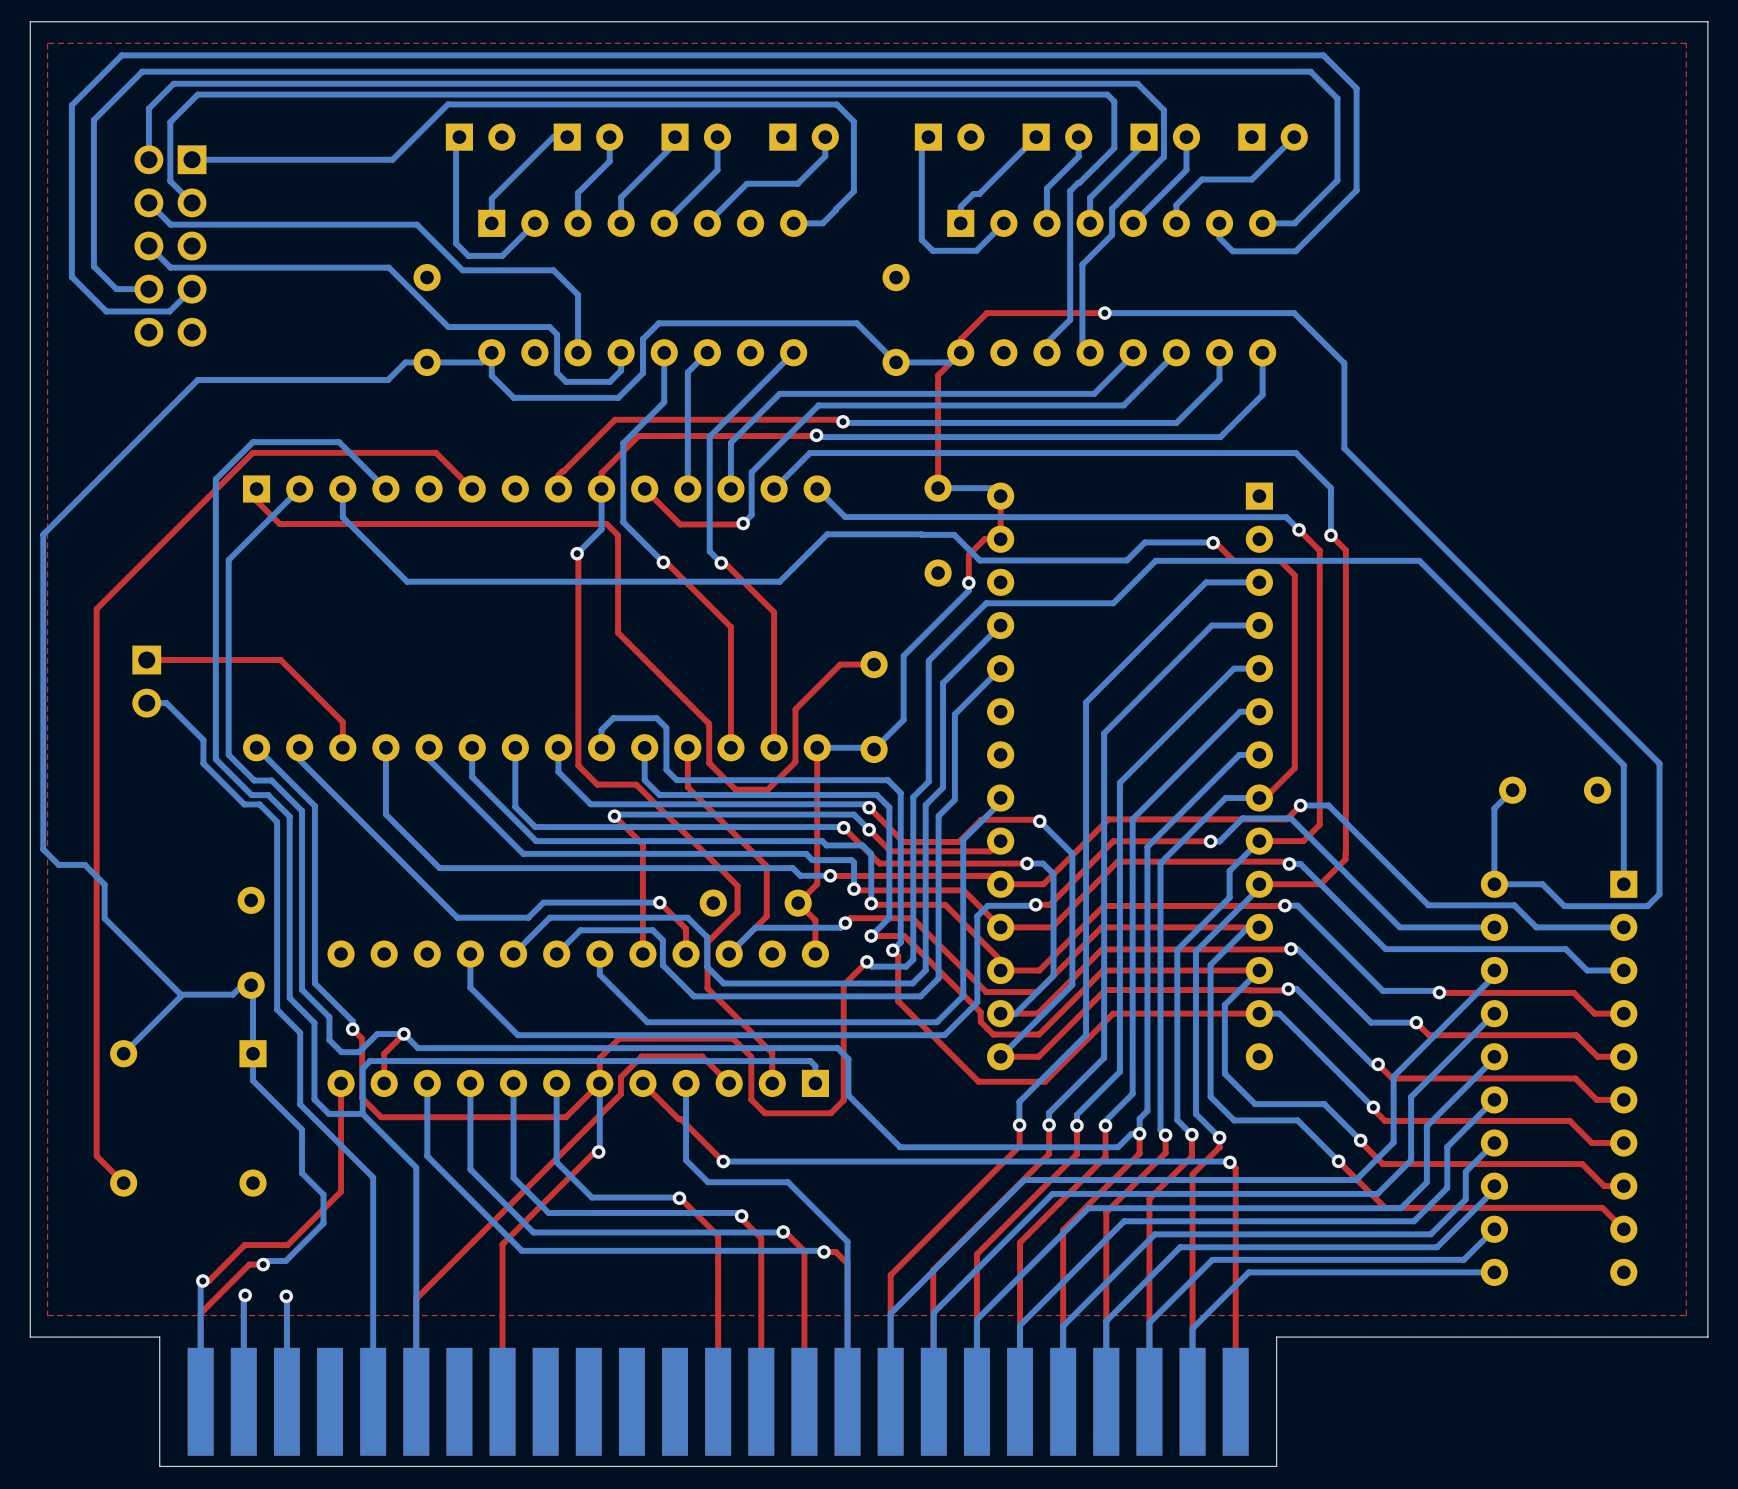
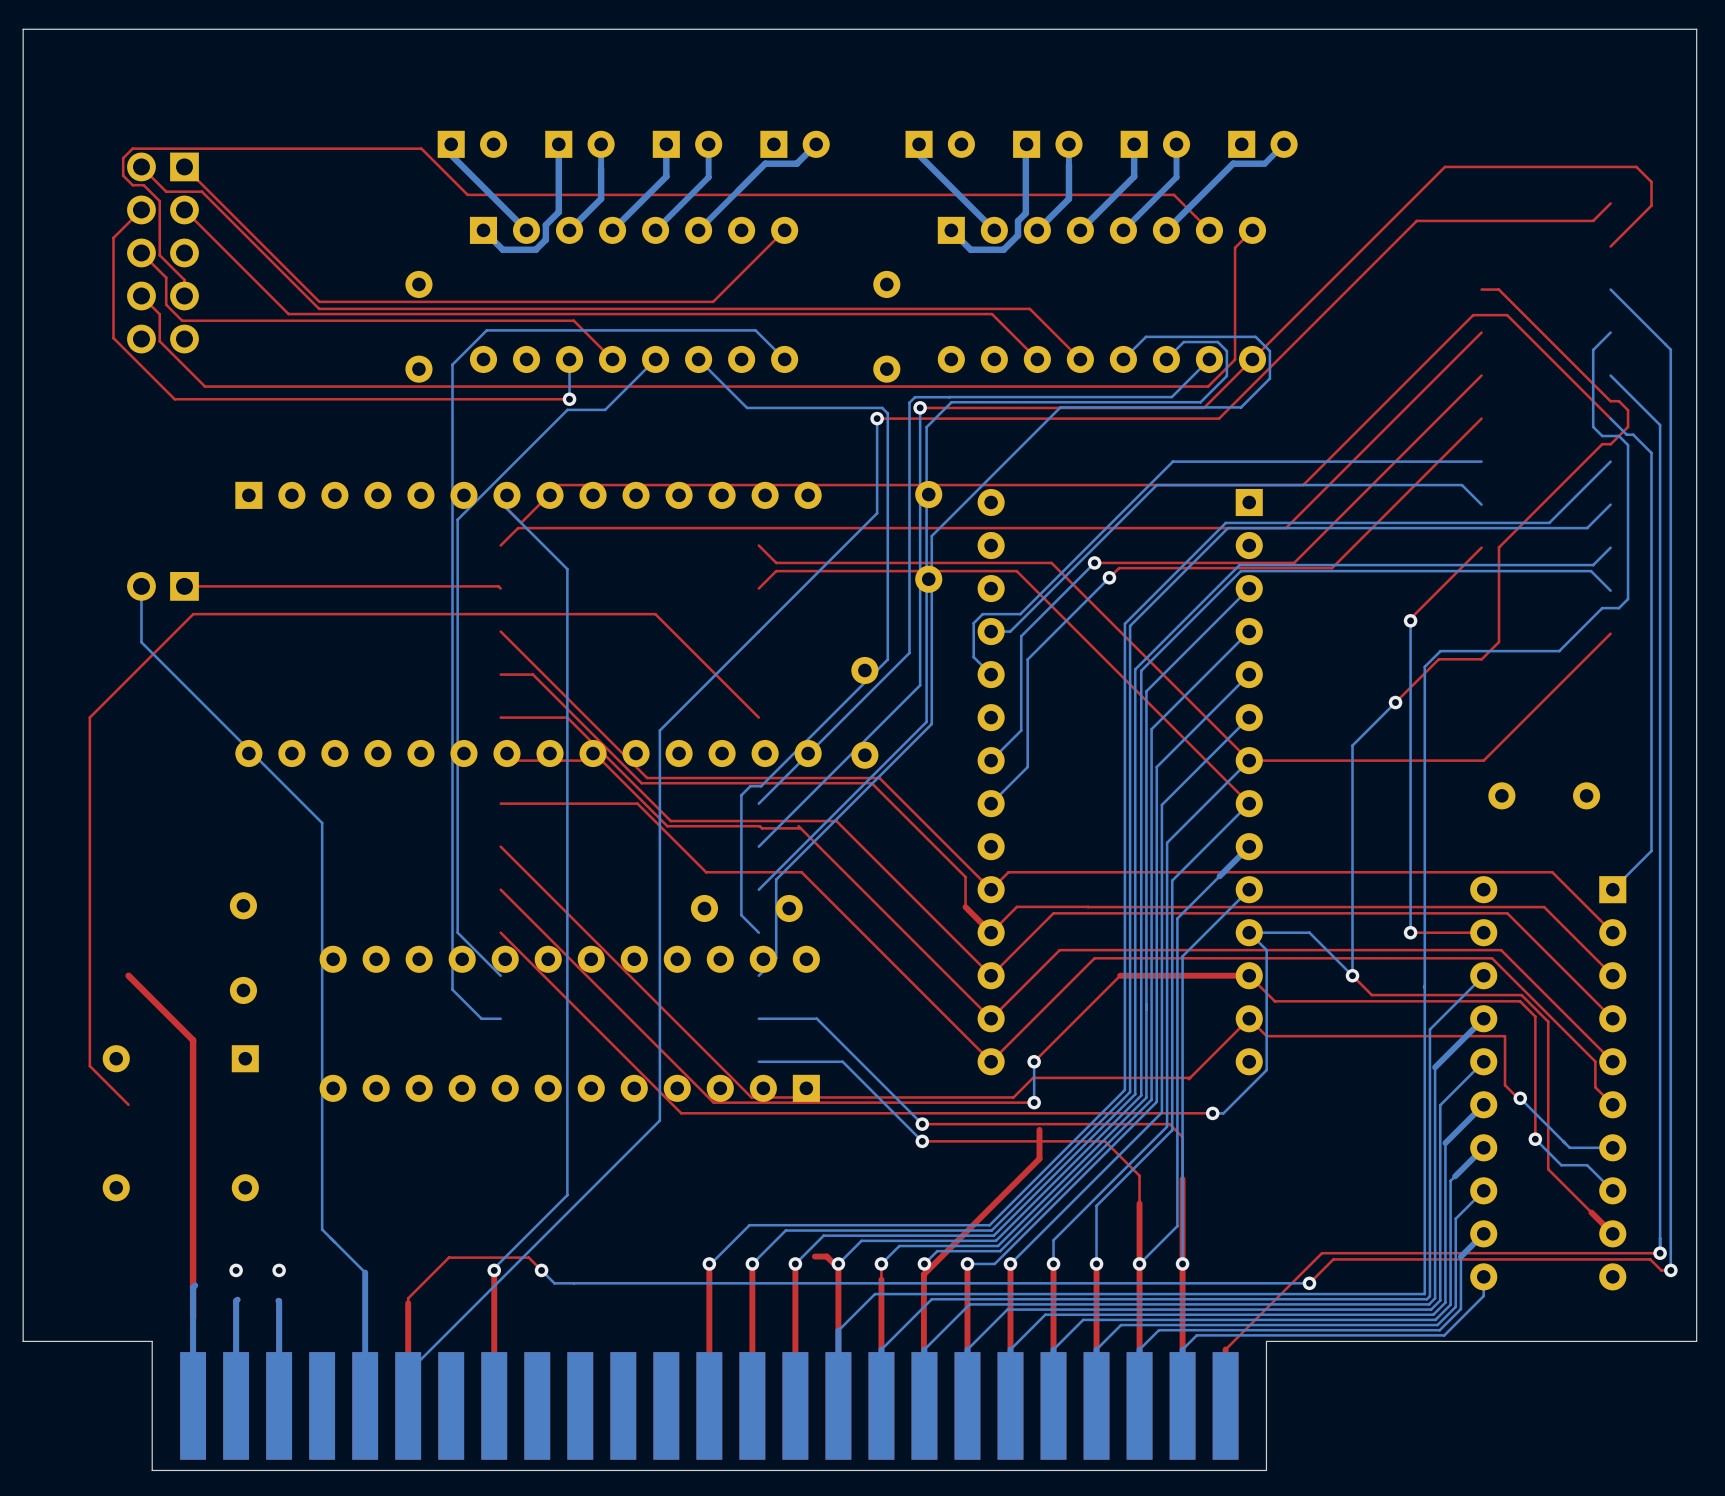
top zone outline: (1686, 43) (1686, 1315) (47, 1315) (47, 43) (1686, 43) -> none
bottom track: (567, 137) (553, 137) (491, 198) (491, 223) -> (551, 151) (558, 144) (558, 212) (545, 225) (545, 239) (535, 249) (502, 249) (483, 230)
bottom track: (825, 137) (825, 156) (797, 183) (747, 183) -> (816, 144) (796, 163) (765, 163) (738, 190)
bottom track: (1035, 137) (979, 193) (973, 193) (960, 206) (960, 223) -> (1025, 145) (1025, 213) (1018, 221) (1018, 235) (1003, 249) (970, 249) (951, 230)
bottom track: (456, 140) (456, 243) (468, 255) (502, 255) (534, 223) -> (451, 144) (451, 155) (526, 230)
bottom track: (675, 143) (621, 197) (621, 223) -> (666, 144) (666, 176) (612, 230)
bottom track: (921, 143) (921, 239) (932, 250) (976, 250) (1003, 223) -> (919, 144) (919, 155) (994, 230)
bottom track: (1144, 144) (1090, 197) (1090, 223) -> (1134, 144) (1134, 176) (1080, 230)
bottom track: (1078, 156) (1047, 188) (1047, 223) -> (1068, 163) (1068, 198) (1037, 230)
bottom track: (1274, 156) (1251, 179) (1201, 179) (1176, 205) (1176, 223) -> (1264, 163) (1233, 163) (1166, 230)
top track: none -> (141, 166) (166, 191) (201, 191) (319, 308) (1029, 308) (1080, 359)
bottom track: (148, 159) (148, 108) (173, 83) (1137, 83) (1163, 110) (1163, 157) (1112, 208) (1112, 234) (1082, 264) (1082, 345) (1090, 352) -> none
top track: none -> (184, 166) (319, 301) (713, 301) (784, 230)
bottom track: (192, 159) (392, 159) (447, 104) (836, 104) (853, 121) (853, 191) (822, 223) (793, 223) -> none
bottom track: (609, 161) (578, 193) (578, 223) -> (601, 168) (601, 198) (569, 230)
top track: none -> (1610, 203) (1593, 220) (1416, 220) (1219, 418) (877, 418)
top track: none -> (141, 209) (113, 237) (113, 338) (174, 399) (569, 399)
bottom track: (148, 202) (170, 224) (417, 224) (462, 270) (553, 270) (578, 294) (578, 352) -> (569, 399) (569, 359)
top track: none -> (184, 209) (288, 314) (991, 314) (1037, 359)
bottom track: (192, 202) (170, 181) (170, 122) (197, 94) (1107, 94) (1114, 101) (1114, 148) (1070, 191) (1070, 319) (1047, 342) -> none
top track: none -> (1209, 230) (1173, 194) (467, 194) (421, 148) (132, 148) (123, 158) (123, 175) (132, 185) (143, 185) (159, 201) (159, 255) (184, 280) (184, 296)
bottom track: (1219, 223) (1219, 237) (1232, 251) (1295, 251) (1356, 190) (1356, 88) (1323, 55) (121, 55) (71, 105) (71, 276) (106, 311) (169, 311) (192, 289) -> none
top track: none -> (1252, 230) (1235, 247) (1235, 359) (1208, 386) (204, 386) (159, 341) (159, 314) (141, 296)
bottom track: (1262, 223) (1294, 223) (1337, 180) (1337, 98) (1310, 71) (142, 71) (93, 120) (93, 266) (116, 289) (148, 289) -> none
top track: none -> (1610, 246) (1651, 205) (1651, 181) (1636, 166) (1445, 166) (1203, 407) (920, 407)
top track: none -> (141, 252) (166, 277) (166, 304) (182, 320) (573, 320) (612, 359)
bottom track: (148, 246) (170, 267) (388, 267) (448, 327) (549, 327) (557, 334) (557, 372) (566, 381) (609, 381) (621, 370) (621, 352) -> none
top track: none -> (1481, 289) (1498, 289) (1610, 401) (1618, 401) (1628, 410) (1628, 426) (1610, 444) (1602, 444) (1498, 547) (1498, 642) (1481, 659) (1438, 659) (1395, 702)
bottom track: none -> (1610, 289) (1670, 349) (1670, 1270)
top track: (1104, 313) (986, 313) (960, 339) (960, 352) (938, 375) (938, 488) -> none
bottom track: (1104, 313) (1294, 313) (1344, 363) (1344, 448) (1659, 763) (1659, 894) (1647, 906) (1564, 906) (1542, 884) (1494, 884) (1494, 808) (1512, 790) -> none
via: (1104, 313) -> none
top track: none -> (1481, 332) (1286, 528) (518, 528) (500, 545)
bottom track: (664, 352) (664, 402) (623, 443) (623, 522) (663, 562) -> (655, 359) (605, 409) (567, 409) (457, 519) (457, 932) (500, 975)
bottom track: (707, 352) (687, 372) (687, 489) -> (698, 359) (747, 407) (882, 407) (887, 413) (887, 659) (761, 786) (750, 786) (741, 795) (741, 915) (758, 932)
bottom track: (793, 352) (709, 436) (709, 551) (721, 563) -> (784, 359) (755, 330) (486, 330) (452, 364) (452, 989) (481, 1018) (500, 1018)
bottom track: (960, 352) (951, 362) (896, 362) (856, 323) (658, 323) (643, 339) (643, 373) (618, 397) (513, 397) (491, 375) (491, 352) (482, 362) (405, 362) (387, 380) (197, 380) (43, 534) (43, 849) (58, 864) (84, 864) (104, 884) (104, 918) (180, 994) -> none
bottom track: none -> (1123, 359) (1146, 336) (1255, 336) (1269, 351) (1269, 378) (1241, 407) (1060, 407) (931, 536) (931, 724) (776, 879) (776, 958) (758, 975)
bottom track: (1176, 352) (1123, 405) (818, 405) (751, 472) (751, 514) (743, 523) -> (1166, 359) (1183, 342) (1217, 342) (1226, 351) (1226, 375) (1200, 402) (951, 402) (926, 427) (926, 721) (758, 889)
bottom track: (1219, 352) (1219, 379) (1176, 422) (843, 421) -> (1209, 359) (1171, 397) (915, 397) (909, 402) (909, 652) (758, 803)
bottom track: (1262, 352) (1262, 394) (1220, 437) (818, 437) (816, 435) -> none
bottom track: (1133, 354) (1094, 393) (779, 393) (730, 442) (730, 489) -> none
top track: none -> (1481, 375) (1294, 562) (1094, 562)
bottom track: none -> (1610, 375) (1660, 425) (1660, 1253)
via: none -> (569, 399)
bottom track: none -> (920, 407) (920, 685) (758, 846)
via: none -> (920, 407)
via: none -> (877, 418)
top track: none -> (1481, 418) (1332, 568) (1119, 568) (1109, 577)
top track: none -> (1610, 418) (1507, 315) (1473, 315) (1303, 485) (558, 485) (521, 522) (500, 502)
top track: (843, 421) (840, 419) (615, 419) (558, 475) (558, 489) -> none
via: (843, 421) -> none
top track: (816, 435) (638, 436) (601, 473) (601, 489) -> none
via: (816, 435) -> none
bottom track: none -> (1610, 461) (1549, 522) (1225, 522) (1124, 623) (1124, 1089) (989, 1225) (749, 1225) (709, 1265) (709, 1268)
bottom track: (938, 488) (992, 488) (1000, 496) -> none
top track: (256, 489) (256, 500) (279, 523) (606, 523) (618, 535) (618, 632) (709, 723) (709, 763) (735, 789) (767, 789) (795, 762) (795, 709) (840, 664) (874, 664) -> none
bottom track: (299, 489) (228, 560) (228, 754) (254, 780) (271, 780) (302, 810) (302, 989) (329, 1017) (329, 1040) (341, 1052) (359, 1052) (377, 1034) (403, 1034) (418, 1048) (837, 1048) (848, 1058) (848, 1095) (900, 1147) (1118, 1147) (1131, 1133) (1139, 1133) (1139, 1118) (1147, 1110) (1147, 846) (1239, 754) (1259, 754) -> (1053, 1263) (1053, 1240) (1167, 1126) (1167, 842) (1249, 760)
bottom track: (342, 489) (342, 517) (407, 581) (779, 581) (827, 534) (954, 534) (979, 560) (1126, 560) (1144, 542) (1213, 542) -> none
bottom track: (385, 489) (339, 442) (253, 442) (215, 479) (215, 759) (251, 795) (268, 795) (289, 816) (289, 998) (314, 1022) (314, 1099) (329, 1113) (362, 1113) -> none
top track: (472, 489) (436, 452) (252, 452) (96, 609) (96, 1156) (123, 1183) -> none
bottom track: (601, 489) (601, 529) (577, 553) -> none
top track: (644, 489) (680, 524) (743, 523) -> none
bottom track: (774, 489) (810, 453) (1295, 453) (1330, 488) (1330, 535) -> none
bottom track: (817, 489) (845, 517) (1003, 517) -> none
bottom track: none -> (500, 502) (567, 569) (567, 1195) (494, 1268)
top track: (1000, 496) (1000, 539) (984, 539) (968, 555) (968, 582) -> none
bottom track: none -> (1610, 504) (1587, 528) (1227, 528) (1130, 625) (1130, 1092) (991, 1230) (785, 1230) (752, 1263)
bottom track: (1003, 517) (1286, 517) (1299, 529) -> none
via: (743, 523) -> none
top track: (1299, 529) (1319, 550) (1319, 824) (1303, 841) (1259, 841) -> none
via: (1299, 529) -> none
top track: (1330, 535) (1345, 550) (1345, 859) (1320, 884) (1259, 884) -> none
via: (1330, 535) -> none
top track: none -> (758, 545) (776, 562) (1051, 562) (1249, 760) (1483, 760) (1610, 633)
top track: none -> (1481, 547) (1410, 620)
bottom track: none -> (1610, 547) (1593, 565) (1239, 565) (1135, 669) (1135, 1094) (993, 1235) (823, 1235) (795, 1263)
top track: (1213, 542) (1215, 542) (1233, 560) (1280, 560) (1294, 575) (1294, 768) (1264, 798) -> none
via: (1213, 542) -> none
top track: (577, 553) (578, 765) (597, 784) (636, 784) (737, 885) (737, 912) (707, 942) (707, 988) (772, 1053) (772, 1083) -> none
via: (577, 553) -> none
bottom track: none -> (1094, 562) (1021, 636) (1021, 730) (991, 760)
via: none -> (1094, 562)
top track: (663, 562) (666, 562) (730, 627) (730, 747) -> none
via: (663, 562) -> none
top track: (721, 563) (724, 563) (774, 612) (774, 747) -> none
via: (721, 563) -> none
bottom track: none -> (1109, 577) (1027, 659) (1027, 767) (991, 803)
via: none -> (1109, 577)
top track: none -> (184, 586) (498, 586) (500, 588)
top track: none -> (758, 588) (776, 571) (1016, 571) (1249, 803)
bottom track: (968, 582) (968, 590) (903, 655) (903, 719) (874, 749) -> none
via: (968, 582) -> none
bottom track: (1259, 582) (1206, 582) (1086, 702) (1086, 1035) (1019, 1101) (1019, 1125) -> (1249, 588) (1146, 691) (1146, 1097) (998, 1246) (899, 1246) (881, 1263)
bottom track: none -> (1610, 590) (1591, 571) (1240, 571) (1141, 670) (1141, 1095) (995, 1240) (861, 1240) (838, 1263)
bottom track: none -> (1410, 620) (1410, 932)
via: none -> (1410, 620)
bottom track: (1000, 625) (943, 683) (943, 787) (925, 804) (925, 970) (912, 983) (723, 983) (707, 966) (707, 937) (687, 917) (549, 917) (513, 954) -> (991, 631) (1010, 631) (1156, 485) (1461, 485) (1481, 504)
bottom track: (1259, 625) (1211, 625) (1104, 733) (1104, 1057) (1049, 1112) (1049, 1125) -> (1249, 631) (1151, 729) (1151, 1099) (1000, 1251) (937, 1251) (924, 1263)
top track: (146, 660) (280, 660) (342, 722) (342, 747) -> none
bottom track: (1000, 668) (954, 714) (954, 799) (938, 816) (938, 978) (920, 996) (694, 996) (662, 965) (662, 940) (652, 930) (580, 930) (556, 954) -> (991, 674) (973, 657) (973, 623) (982, 614) (1020, 614) (1172, 461) (1481, 461)
bottom track: (1259, 668) (1234, 668) (1119, 782) (1119, 1071) (1076, 1114) (1076, 1125) -> (1249, 674) (1156, 767) (1156, 1101) (994, 1263) (967, 1263)
part rotation: 0° (146, 681) -> 90° clockwise (162, 586)
part position: (146, 681) -> (162, 586)
bottom track: none -> (1395, 702) (1352, 745) (1352, 975) (1309, 932) (1249, 932) (1266, 950) (1266, 1070) (1223, 1113) (1212, 1113)
via: none -> (1395, 702)
bottom track: (146, 703) (166, 703) (203, 740) (203, 763) (244, 804) (259, 804) (277, 821) (277, 1009) (300, 1032) (300, 1104) (373, 1177) (373, 1268) -> (141, 586) (141, 642) (322, 823) (322, 1229) (365, 1272)
top track: none -> (758, 717) (655, 614) (193, 614) (89, 717) (89, 1066) (128, 1104)
bottom track: (1259, 711) (1240, 711) (1132, 819) (1132, 1093) (1105, 1121) (1105, 1125) -> (1249, 717) (1161, 804) (1161, 1112) (1010, 1263)
bottom track: (256, 747) (314, 806) (314, 983) (352, 1021) (352, 1029) -> none
bottom track: (299, 747) (299, 759) (457, 917) (528, 917) (543, 902) (659, 902) -> none
bottom track: (385, 747) (385, 814) (439, 868) (792, 868) (800, 875) (830, 875) -> none
bottom track: (429, 747) (429, 759) (523, 853) (806, 853) (812, 860) (851, 860) (854, 862) (854, 889) -> none
bottom track: (472, 747) (472, 777) (536, 841) (822, 841) (826, 845) (862, 845) (871, 854) (871, 903) -> none
bottom track: (515, 747) (515, 807) (535, 827) (843, 827) -> none
bottom track: (558, 747) (558, 772) (590, 804) (866, 804) -> none
bottom track: (601, 747) (601, 729) (613, 718) (656, 718) (666, 727) (666, 769) (676, 780) (887, 780) (900, 792) (900, 942) (892, 950) -> none
bottom track: (644, 747) (644, 780) (659, 794) (876, 794) (889, 807) (889, 917) (871, 936) -> none
top track: (687, 747) (687, 787) (766, 866) (766, 916) (729, 954) -> none
top track: (817, 747) (817, 884) (798, 903) (815, 920) (815, 954) -> none
bottom track: (872, 747) (817, 747) -> none
top track: none -> (500, 760) (601, 760) (667, 826) (800, 828)
bottom track: (1259, 798) (1225, 798) (1160, 863) (1160, 1130) (1165, 1135) -> (1249, 803) (1172, 880) (1172, 1130) (1096, 1205) (1096, 1263)
bottom track: (1000, 802) (963, 839) (963, 995) (936, 1022) (647, 1022) (599, 974) (599, 954) -> none
top track: (1300, 805) (1286, 819) (1108, 819) (1043, 884) (1000, 884) -> (1612, 932) (1552, 872) (1008, 872) (991, 889)
bottom track: (1300, 805) (1328, 805) (1428, 905) (1514, 905) (1536, 927) (1623, 927) -> none
via: (1300, 805) -> none
top track: (869, 807) (903, 841) (958, 841) (981, 819) (1039, 821) -> none
via: (869, 807) -> none
top track: (614, 816) (642, 844) (642, 954) -> none
bottom track: (614, 816) (616, 814) (853, 814) (869, 829) -> none
via: (614, 816) -> none
bottom track: (1039, 821) (1072, 853) (1072, 985) (1000, 1056) -> none
via: (1039, 821) -> none
top track: (843, 827) (879, 863) (1027, 863) -> none
via: (843, 827) -> none
top track: (869, 829) (890, 851) (990, 851) (1000, 841) -> none
via: (869, 829) -> none
top track: none -> (500, 846) (751, 1097) (1013, 1097) (1033, 1077) (1190, 1077)
top track: (1210, 841) (1113, 841) (1049, 904) (1035, 904) -> none
bottom track: (1210, 841) (1219, 841) (1242, 818) (1290, 818) (1399, 927) (1494, 927) -> none
via: (1210, 841) -> none
bottom track: (1027, 863) (1043, 863) (1053, 874) (1053, 975) (1015, 1013) (1000, 1013) -> none
via: (1027, 863) -> none
top track: (1289, 864) (1287, 861) (1117, 861) (1052, 927) (1000, 927) -> (1087, 906) (1016, 906) (991, 932)
bottom track: (1289, 864) (1300, 864) (1385, 949) (1565, 949) (1587, 970) (1623, 970) -> none
via: (1289, 864) -> none
bottom track: (1229, 870) (1229, 897) (1177, 949) (1177, 1120) (1191, 1134) -> (1219, 876) (1177, 918) (1177, 1226) (1139, 1263)
via: (830, 875) -> none
top track: (992, 875) (830, 875) -> (982, 881) (879, 778) (647, 778) (500, 631)
top track: none -> (500, 889) (713, 1102) (1034, 1102)
bottom track: none -> (1249, 889) (1182, 956) (1182, 1263)
bottom track: (1623, 884) (1623, 765) (1419, 560) (1155, 560) (1113, 603) (986, 603) (928, 660) (928, 781) (913, 797) (913, 959) (906, 966) (871, 966) (866, 961) -> (1612, 889) (1651, 850) (1651, 453) (1633, 434) (1626, 434) (1610, 418)
bottom track: (1259, 888) (1195, 951) (1195, 1113) (1219, 1137) -> none
top track: (854, 889) (963, 890) (974, 901) -> (500, 674) (532, 674) (641, 783) (871, 783) (965, 876) (965, 907)
via: (854, 889) -> none
top track: none -> (1088, 907) (1544, 907) (1612, 975)
top track: (659, 902) (686, 928) (686, 954) -> none
via: (659, 902) -> none
top track: (871, 903) (945, 904) (1000, 960) -> none
via: (871, 903) -> none
bottom track: (1035, 904) (987, 905) (977, 916) (977, 1002) (944, 1035) (517, 1035) (470, 987) (470, 954) -> none
via: (1035, 904) -> none
top track: (1284, 905) (1103, 906) (1039, 970) (1000, 970) -> none
bottom track: (1284, 905) (1297, 905) (1382, 990) (1437, 990) (1439, 992) -> none
via: (1284, 905) -> none
top track: (845, 923) (850, 918) (912, 918) (986, 992) (1037, 992) (1101, 927) (1259, 927) -> none
bottom track: (845, 923) (840, 927) (755, 927) (729, 954) -> none
via: (845, 923) -> none
top track: none -> (500, 932) (681, 1113) (1212, 1113)
bottom track: (1259, 927) (1248, 927) (1210, 964) (1210, 1096) (1234, 1120) (1297, 1120) (1338, 1161) -> none
via: none -> (1410, 932)
top track: none -> (1483, 932) (1410, 932)
top track: (871, 936) (904, 936) (980, 1012) (980, 1021) (993, 1034) (1039, 1034) (1103, 970) (1130, 970) -> (1034, 1061) (1120, 975)
via: (871, 936) -> none
top track: (1291, 948) (1101, 949) (1037, 1013) (1000, 1013) -> none
bottom track: (1291, 948) (1297, 948) (1371, 1022) (1416, 1022) -> none
via: (1291, 948) -> none
top track: (892, 950) (898, 955) (898, 1001) (978, 1081) (1045, 1081) (1113, 1013) (1259, 1013) -> none
via: (892, 950) -> none
top track: (866, 961) (843, 985) (843, 1100) (830, 1113) (764, 1113) (751, 1099) (751, 1056) (732, 1038) (619, 1038) (599, 1058) (599, 1083) (566, 1117) (381, 1117) (362, 1098) (362, 1038) (352, 1029) -> none
via: (866, 961) -> none
top track: none -> (1249, 975) (1274, 1001) (1520, 1001) (1535, 1016) (1535, 1139)
bottom track: (1259, 970) (1224, 1005) (1224, 1073) (1255, 1104) (1324, 1104) (1360, 1140) -> none
via: none -> (1352, 975)
bottom track: (1494, 975) (1393, 1076) (1393, 1142) (1356, 1180) (1024, 1180) (890, 1313) (890, 1345) -> (1483, 975) (1429, 1029) (1429, 1296) (1426, 1299) (931, 1299) (881, 1349)
bottom track: (242, 985) (232, 994) (180, 994) -> none
bottom track: (253, 987) (253, 1080) (302, 1129) (302, 1173) (323, 1194) (323, 1223) (285, 1261) (266, 1261) (263, 1264) -> none
top track: (1288, 989) (1105, 990) (1038, 1056) (1000, 1056) -> none
bottom track: (1288, 989) (1296, 989) (1372, 1064) (1378, 1064) -> none
via: (1288, 989) -> none
top track: (1439, 992) (1573, 992) (1594, 1013) (1623, 1013) -> (500, 717) (567, 717) (670, 821) (836, 821) (991, 975) (1053, 913) (1507, 913) (1612, 1018)
via: (1439, 992) -> none
bottom track: (180, 994) (123, 1053) -> none
bottom track: none -> (758, 1018) (816, 1018) (922, 1124)
bottom track: (1259, 1013) (1279, 1013) (1373, 1107) -> none
top track: (1416, 1022) (1428, 1035) (1576, 1035) (1597, 1056) (1623, 1056) -> (798, 826) (991, 1018) (1059, 950) (1501, 950) (1612, 1061)
via: (1416, 1022) -> none
via: (352, 1029) -> none
top track: (403, 1034) (384, 1053) (384, 1083) -> none
via: (403, 1034) -> none
bottom track: none -> (758, 1061) (842, 1061) (922, 1141)
bottom track: none -> (1034, 1061) (1034, 1102)
via: none -> (1034, 1061)
bottom track: (1494, 1058) (1426, 1126) (1426, 1182) (1401, 1208) (1088, 1208) (976, 1319) (976, 1345) -> (1483, 1061) (1440, 1105) (1440, 1300) (1431, 1309) (1007, 1309) (967, 1349)
bottom track: (1445, 1062) (1411, 1096) (1411, 1160) (1377, 1193) (1052, 1193) (933, 1312) (933, 1345) -> (1435, 1067) (1435, 1298) (1429, 1304) (969, 1304) (924, 1349)
top track: (1378, 1064) (1392, 1078) (1575, 1078) (1596, 1099) (1623, 1099) -> (500, 803) (637, 803) (706, 872) (801, 872) (991, 1061) (1094, 958) (1492, 958) (1595, 1061) (1595, 1087) (1612, 1104)
via: (1378, 1064) -> none
top track: none -> (1188, 1079) (1249, 1018) (1266, 1036) (1505, 1036) (1505, 1085) (1520, 1098)
top track: (341, 1083) (341, 1191) (287, 1245) (244, 1245) (208, 1281) (202, 1281) -> none
bottom track: (427, 1083) (427, 1156) (521, 1250) (823, 1252) -> none
bottom track: (470, 1083) (470, 1169) (533, 1232) (783, 1231) -> none
bottom track: (513, 1083) (513, 1177) (548, 1212) (738, 1212) (741, 1216) -> none
bottom track: (556, 1083) (556, 1162) (591, 1197) (679, 1198) -> none
bottom track: (599, 1083) (598, 1152) -> none
top track: (642, 1083) (723, 1161) -> none
bottom track: (686, 1083) (686, 1160) (708, 1182) (788, 1182) (847, 1241) (847, 1326) -> (1610, 332) (1593, 349) (1593, 426) (1602, 436) (1618, 436) (1628, 445) (1628, 599) (1618, 608) (1602, 608) (1559, 651) (1440, 651) (1424, 666) (1424, 1294) (874, 1294) (838, 1330)
top track: (729, 1083) (702, 1056) (641, 1056) (620, 1077) (620, 1094) (416, 1298) -> (541, 1270) (528, 1257) (448, 1257) (408, 1298) (408, 1303)
bottom track: (815, 1083) (815, 1066) (810, 1061) (370, 1061) (362, 1068) (362, 1113) -> none
bottom track: none -> (1520, 1098) (1569, 1147) (1612, 1147)
via: none -> (1520, 1098)
via: none -> (1034, 1102)
top track: (1373, 1107) (1384, 1120) (1569, 1120) (1591, 1143) (1623, 1143) -> none
via: (1373, 1107) -> none
via: none -> (1212, 1113)
bottom track: (362, 1113) (416, 1167) (416, 1367) -> (877, 418) (877, 513) (659, 730) (659, 1120) (408, 1372)
via: none -> (922, 1124)
top track: (1019, 1125) (1019, 1146) (890, 1275) -> (881, 1263) (881, 1279)
via: (1019, 1125) -> none
via: (1049, 1125) -> none
top track: (1076, 1125) (1076, 1154) (976, 1254) (976, 1259) -> none
via: (1076, 1125) -> none
top track: (1105, 1125) (1105, 1157) (1020, 1242) (1020, 1259) -> none
via: (1105, 1125) -> none
top track: (1139, 1133) (1139, 1153) (1063, 1229) (1063, 1259) -> none
via: (1139, 1133) -> none
top track: (1191, 1134) (1191, 1156) (1149, 1198) -> (922, 1141) (1105, 1141) (1139, 1175) (1139, 1203)
via: (1191, 1134) -> none
bottom track: none -> (1535, 1139) (1561, 1165) (1587, 1165) (1612, 1190)
via: none -> (1535, 1139)
top track: (1165, 1135) (1165, 1153) (1106, 1212) (1106, 1259) -> none
via: (1165, 1135) -> none
via: none -> (922, 1141)
top track: (1219, 1137) (1219, 1147) (1192, 1174) -> (922, 1124) (1169, 1124) (1182, 1137) (1182, 1179)
via: (1219, 1137) -> none
bottom track: (1456, 1138) (1447, 1147) (1447, 1188) (1413, 1221) (1124, 1221) (1020, 1325) (1020, 1345) -> (1445, 1143) (1445, 1302) (1433, 1314) (1045, 1314) (1010, 1349)
top track: (1360, 1140) (1382, 1164) (1582, 1164) (1604, 1186) (1623, 1186) -> none
via: (1360, 1140) -> none
top track: (598, 1152) (594, 1152) (502, 1244) (502, 1263) -> none
via: (598, 1152) -> none
bottom track: (723, 1161) (1229, 1162) -> none
via: (723, 1161) -> none
top track: (1338, 1161) (1385, 1207) (1602, 1207) -> (1352, 975) (1371, 995) (1521, 995) (1548, 1021) (1548, 1169) (1591, 1212)
via: (1338, 1161) -> none
top track: (1229, 1162) (1235, 1168) (1235, 1345) -> (1660, 1253) (1321, 1253) (1225, 1349)
via: (1229, 1162) -> none
bottom track: (1465, 1171) (1465, 1199) (1430, 1234) (1154, 1234) (1063, 1326) (1063, 1345) -> (1455, 1176) (1450, 1180) (1450, 1304) (1435, 1319) (1083, 1319) (1053, 1349)
bottom track: (1494, 1189) (1437, 1247) (1180, 1247) (1106, 1321) (1106, 1345) -> (1483, 1190) (1455, 1218) (1455, 1306) (1437, 1325) (1121, 1325) (1096, 1349)
top track: (679, 1198) (718, 1236) (718, 1263) -> none
via: (679, 1198) -> none
top track: (741, 1216) (741, 1218) (761, 1238) (761, 1259) -> none
via: (741, 1216) -> none
top track: (783, 1231) (804, 1251) (804, 1259) -> none
via: (783, 1231) -> none
via: none -> (1660, 1253)
via: (823, 1252) -> none
bottom track: (1471, 1252) (1463, 1259) (1212, 1259) (1149, 1322) (1149, 1345) -> (1460, 1256) (1460, 1309) (1439, 1330) (1158, 1330) (1139, 1349)
via: none -> (709, 1263)
via: none -> (752, 1263)
via: none -> (795, 1263)
via: none -> (838, 1263)
via: none -> (881, 1263)
via: none -> (924, 1263)
via: none -> (967, 1263)
via: none -> (1010, 1263)
via: none -> (1053, 1263)
via: none -> (1096, 1263)
via: none -> (1139, 1263)
via: none -> (1182, 1263)
top track: (263, 1264) (249, 1264) (200, 1313) -> (128, 975) (193, 1040) (193, 1317)
via: (263, 1264) -> none
via: none -> (236, 1270)
via: none -> (279, 1270)
via: none -> (494, 1270)
bottom track: none -> (541, 1270) (554, 1283) (1309, 1283)
via: none -> (541, 1270)
top track: none -> (1670, 1270) (1661, 1270) (1650, 1259) (1333, 1259) (1309, 1283)
via: none -> (1670, 1270)
bottom track: (1494, 1272) (1248, 1272) (1192, 1328) (1192, 1345) -> (1483, 1276) (1483, 1296) (1444, 1335) (1196, 1335) (1182, 1349)
via: none -> (1309, 1283)
via: (202, 1281) -> none
via: (245, 1295) -> none
via: (286, 1296) -> none

